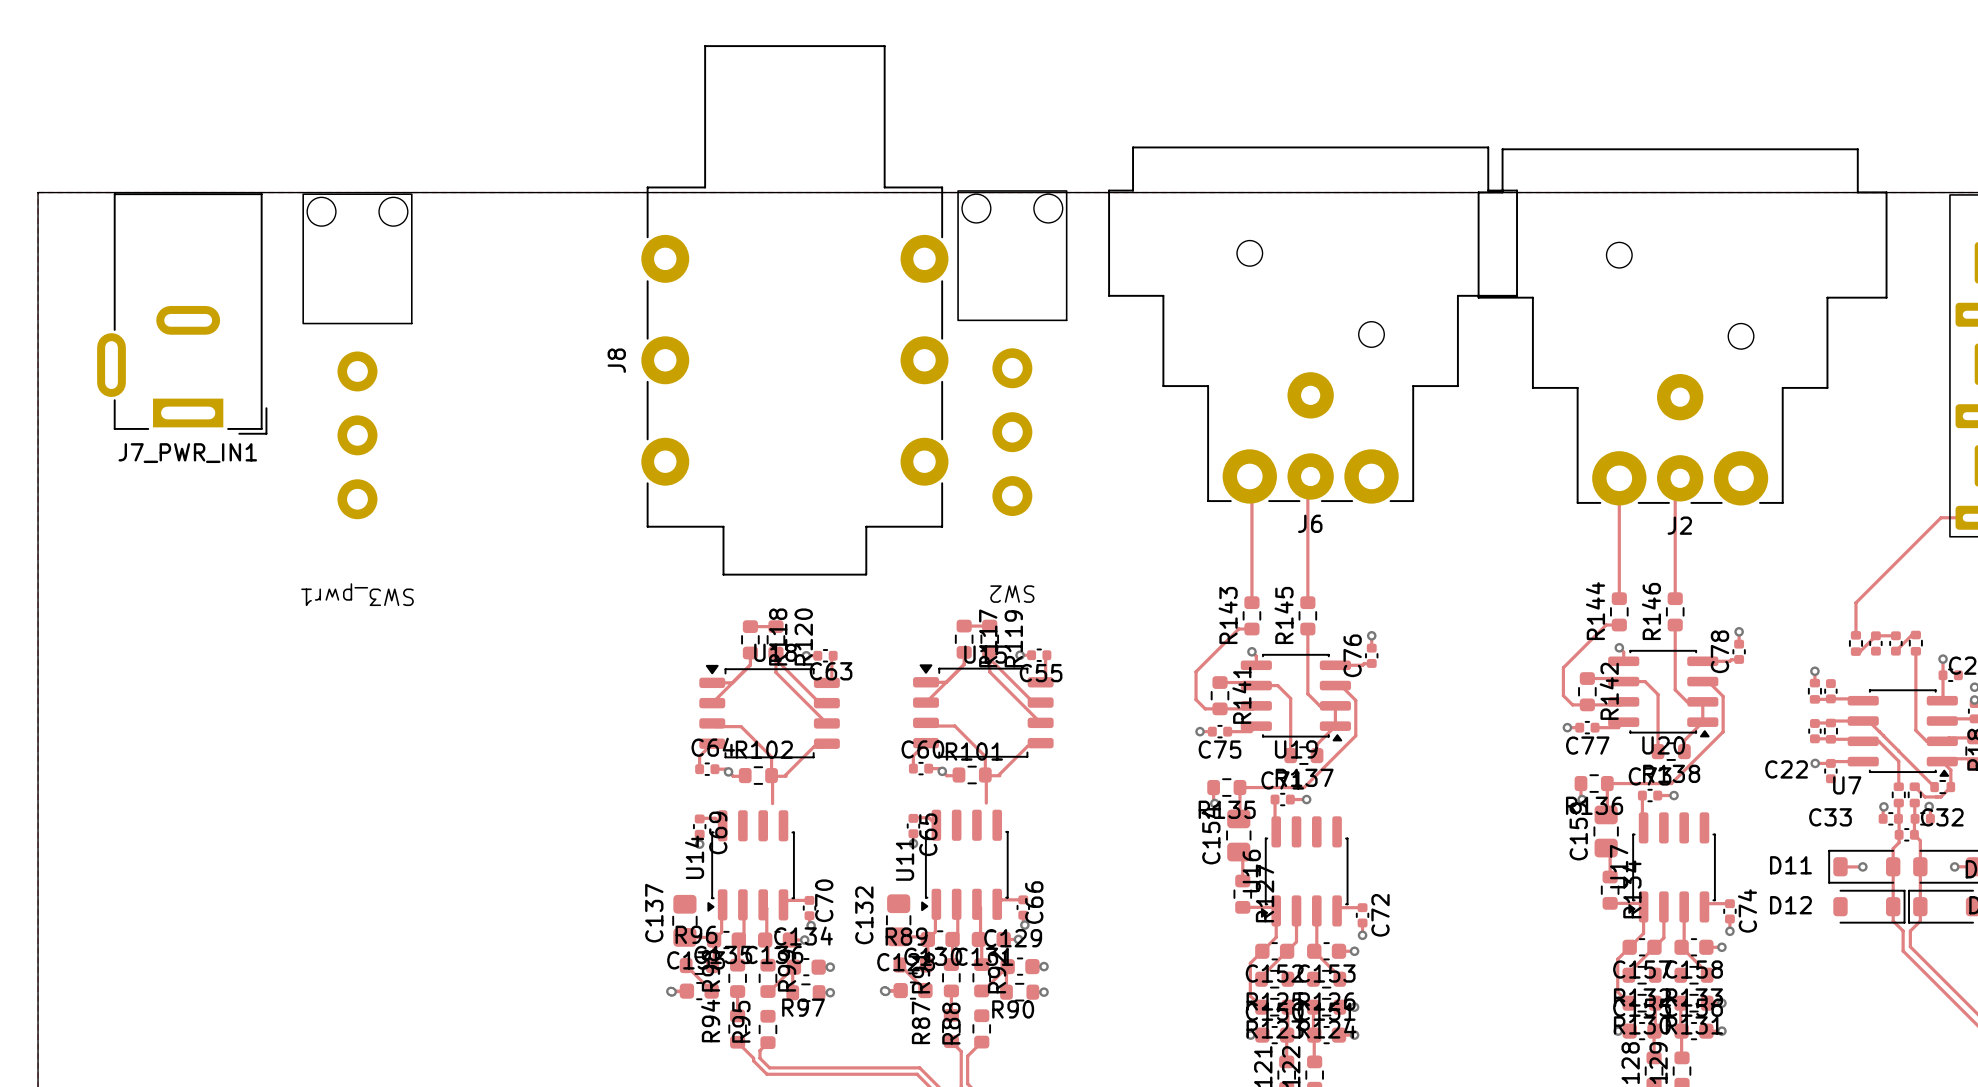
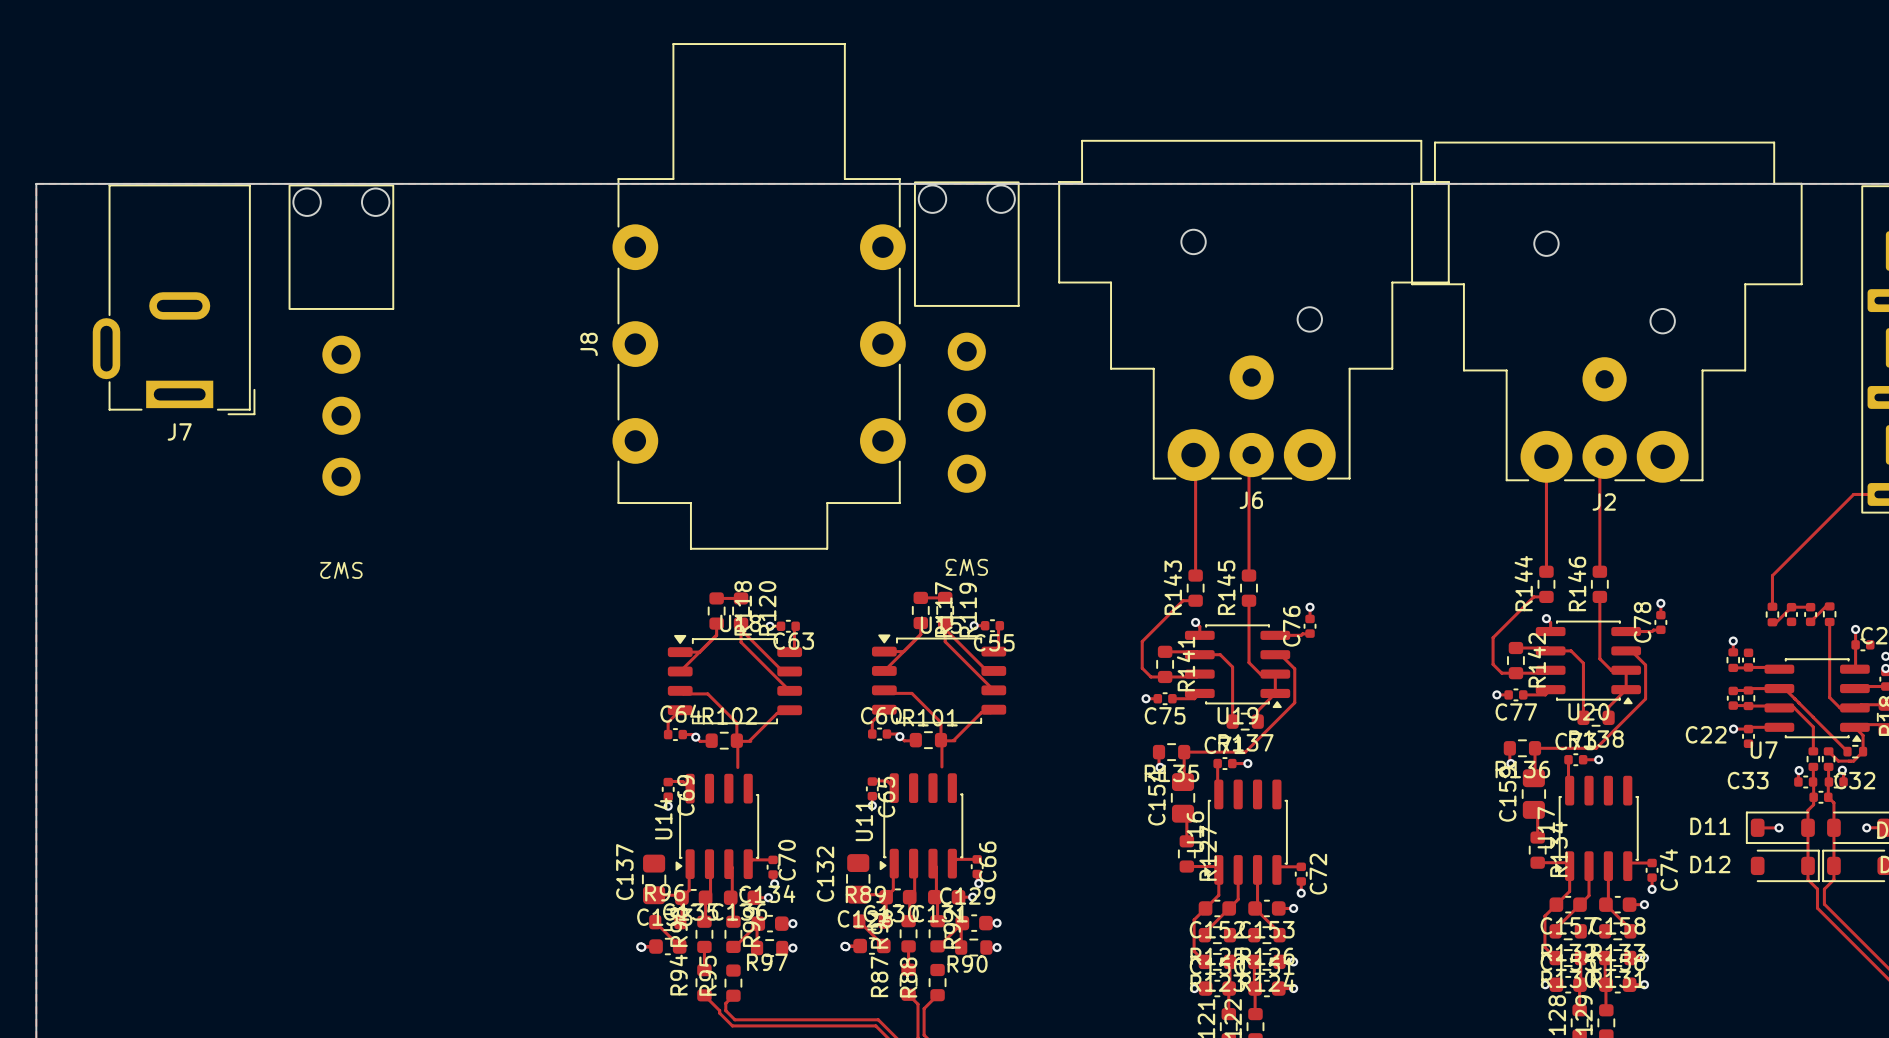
J7_PWR_IN1 name: J7_PWR_IN1 (187, 453) -> J7 (179, 431)
SW3_pwr1 name: SW3_pwr1 (357, 594) -> SW2 (341, 570)
SW2 name: SW2 (1012, 594) -> SW3 (966, 567)

